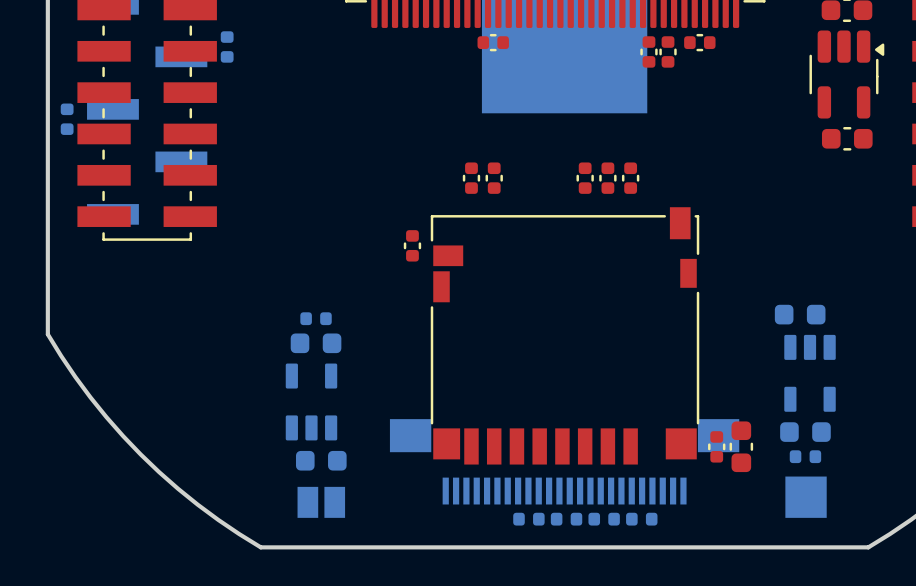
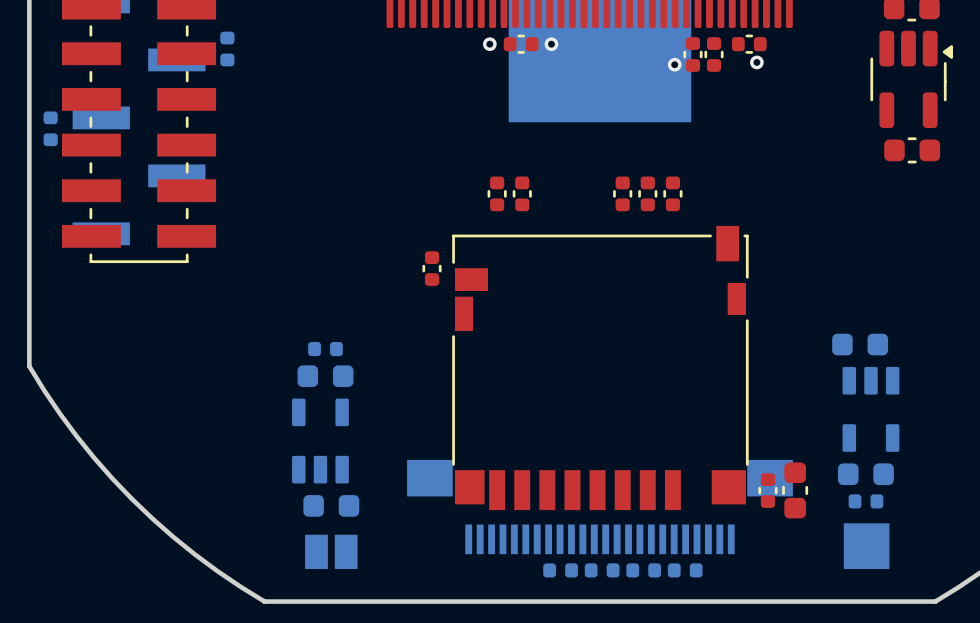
via: none -> (489, 44)
via: none -> (551, 44)
via: none -> (756, 62)
via: none -> (674, 64)

